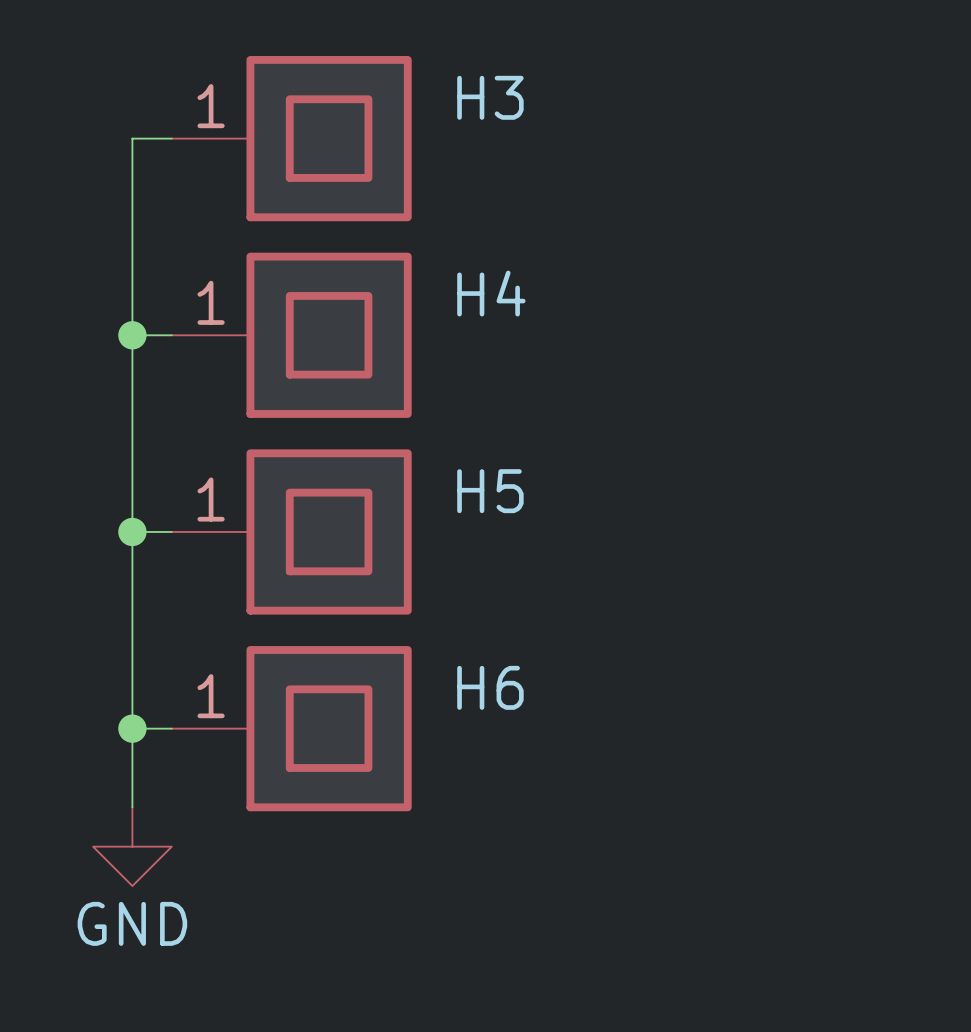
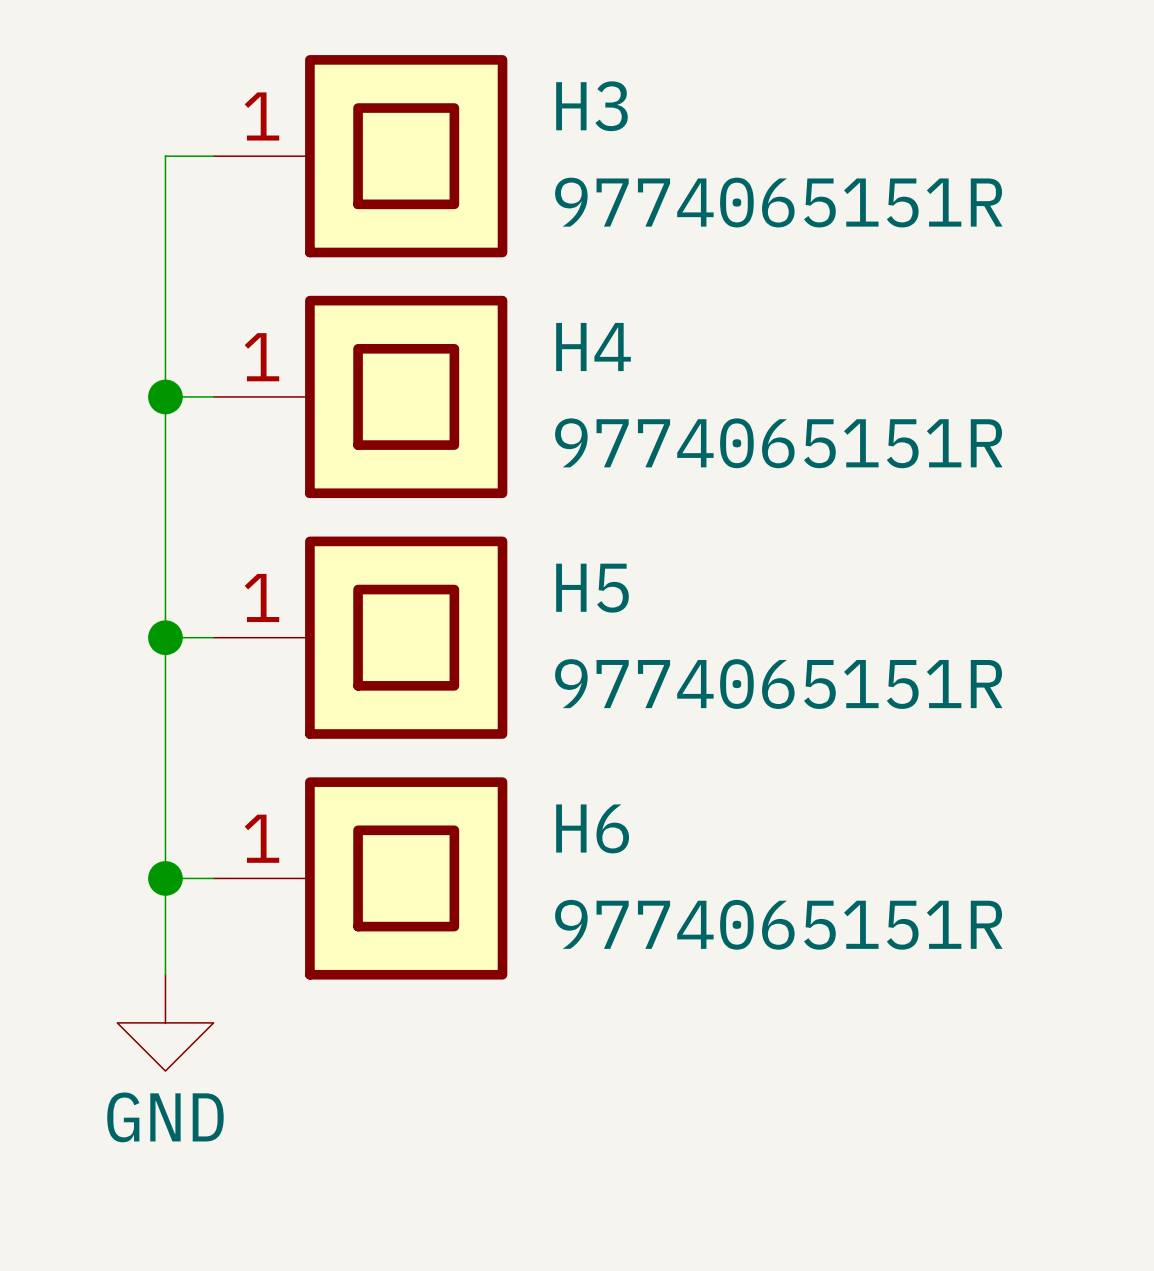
H3 text: none -> 9774065151R (778, 202)
H4 text: none -> 9774065151R (778, 443)
H5 text: none -> 9774065151R (778, 684)
H6 text: none -> 9774065151R (778, 924)

